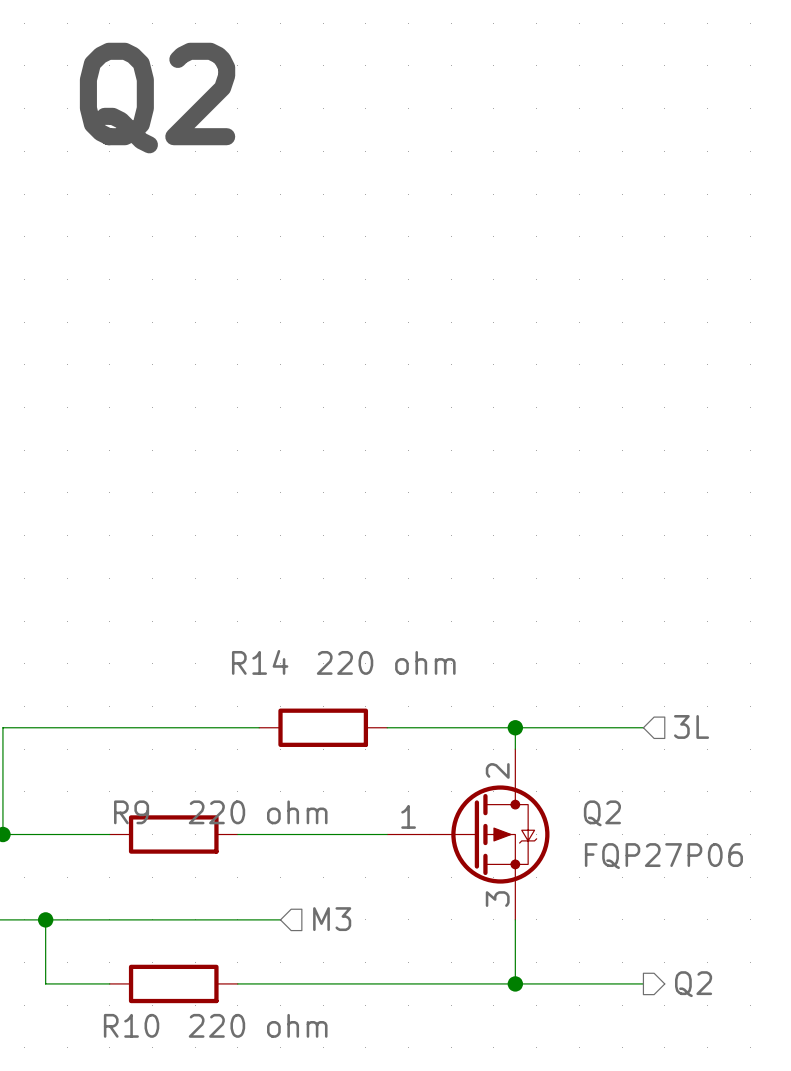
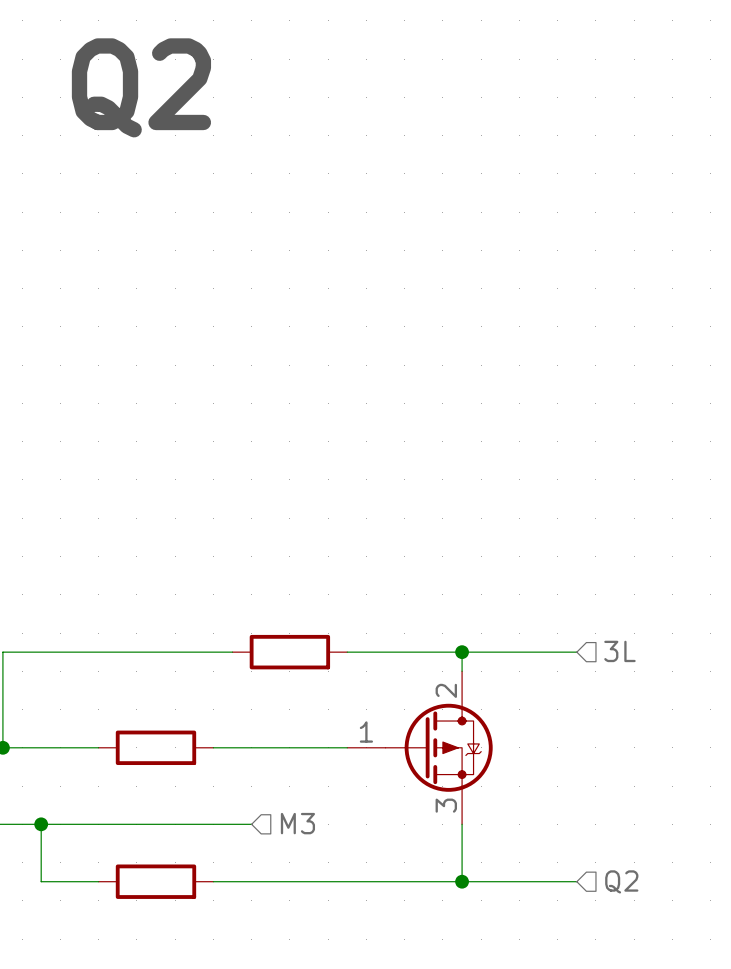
R14 name: R14 (260, 662) -> none
R14 value: 220 ohm (386, 662) -> none
R9 name: R9 (131, 812) -> none
R9 value: 220 ohm (258, 812) -> none
Q2 name: Q2 (602, 813) -> none
Q2 value: FQP27P06 (663, 856) -> none
hierarchical label shape: output (693, 984) -> input (621, 881)
R10 name: R10 (131, 1025) -> none
R10 value: 220 ohm (258, 1025) -> none

